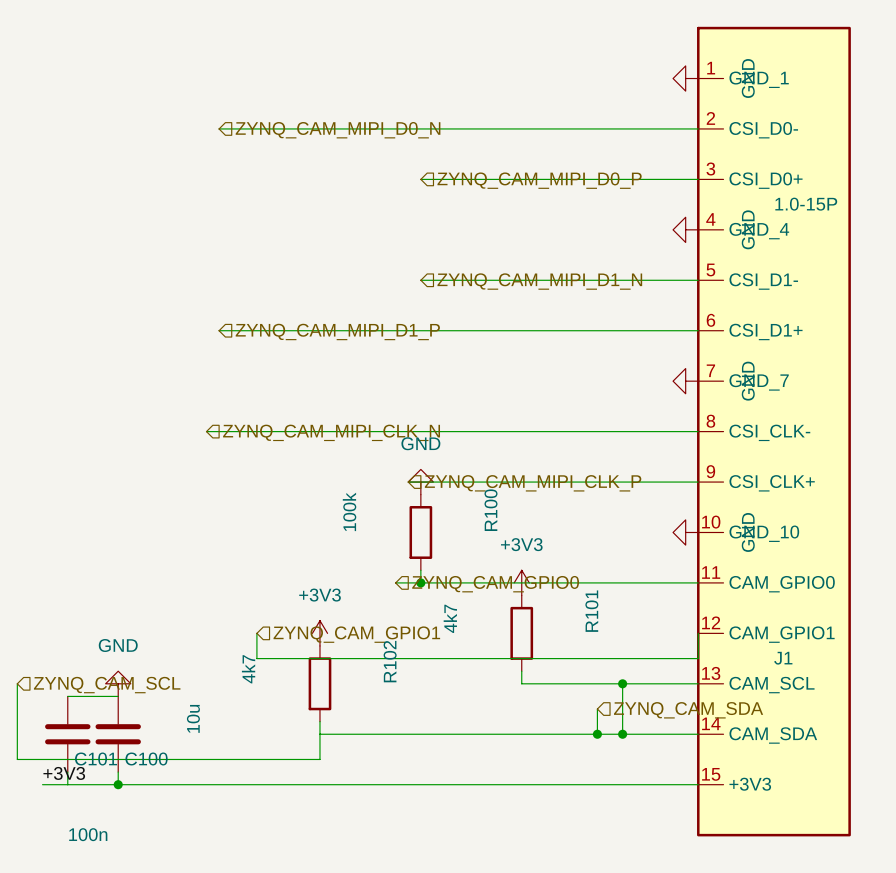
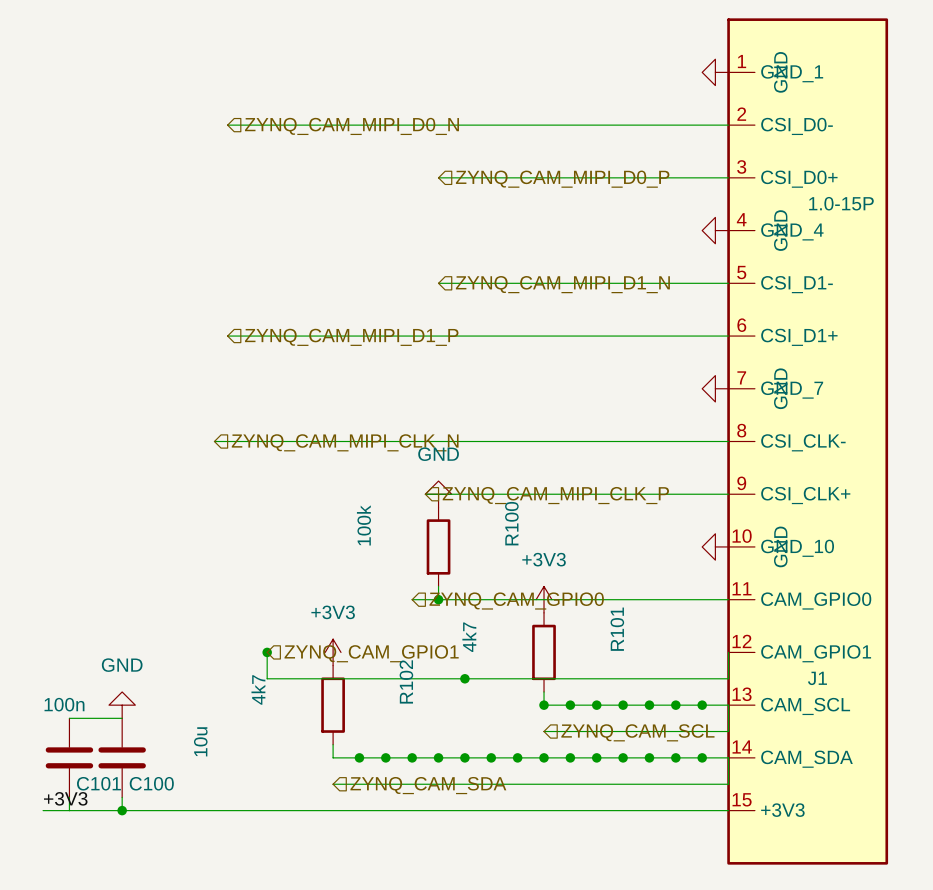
junction: none -> (267, 652)
junction: none -> (464, 678)
wire: (17, 683) (17, 759) (319, 759) (319, 734) -> none
junction: none -> (544, 705)
junction: none -> (570, 705)
junction: none -> (596, 705)
junction: none -> (623, 705)
wire: (622, 683) (622, 734) -> none
junction: none -> (675, 705)
junction: none -> (702, 705)
wire: none -> (728, 705) (728, 731) (544, 731)
hierarchical label: ZYNQ_CAM_SCL (107, 685) -> none
wire: (597, 709) (597, 734) -> none
hierarchical label: ZYNQ_CAM_SDA (688, 710) -> ZYNQ_CAM_SCL (637, 732)
junction: none -> (359, 757)
junction: none -> (385, 757)
junction: none -> (412, 757)
junction: none -> (438, 757)
junction: none -> (464, 757)
junction: none -> (491, 757)
junction: none -> (517, 757)
junction: none -> (544, 757)
junction: none -> (570, 757)
junction: none -> (596, 757)
junction: none -> (675, 757)
junction: none -> (702, 757)
wire: none -> (728, 757) (728, 784) (333, 784)
hierarchical label: none -> ZYNQ_CAM_SDA (428, 785)
C101 value position: 100n (88, 834) -> 100n (64, 704)

